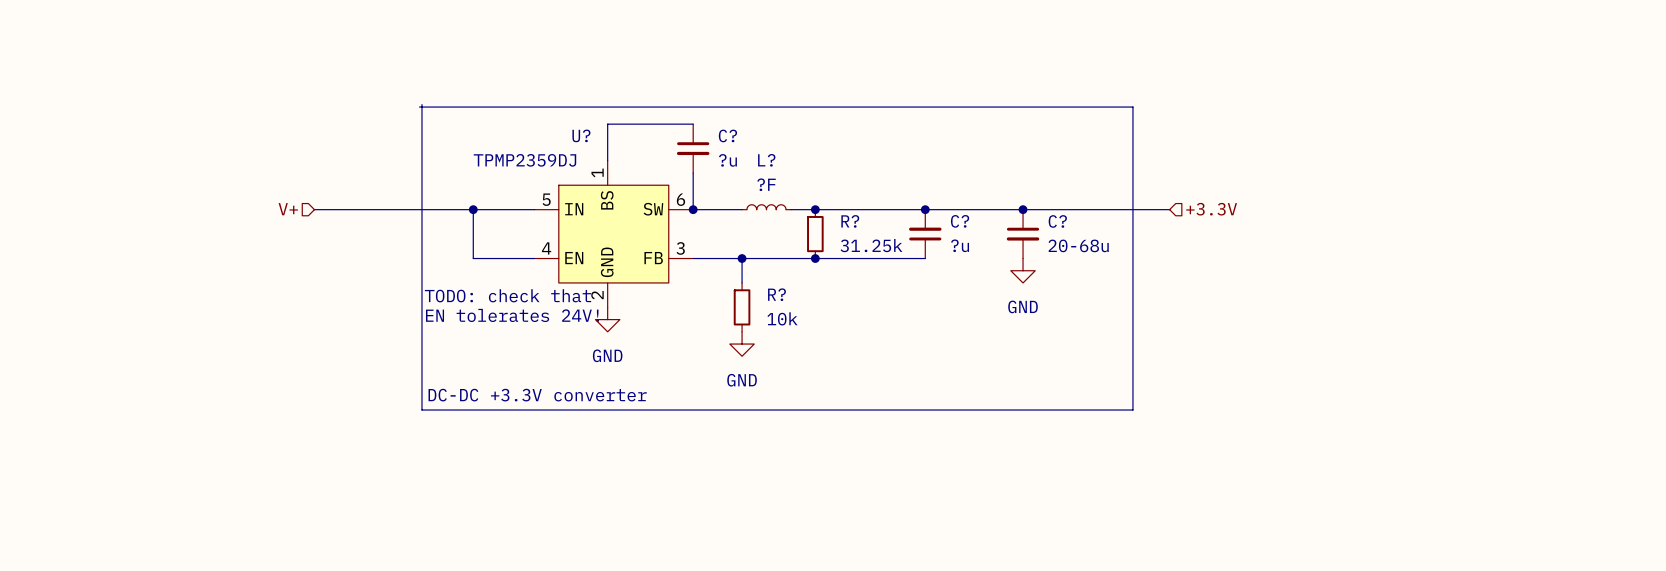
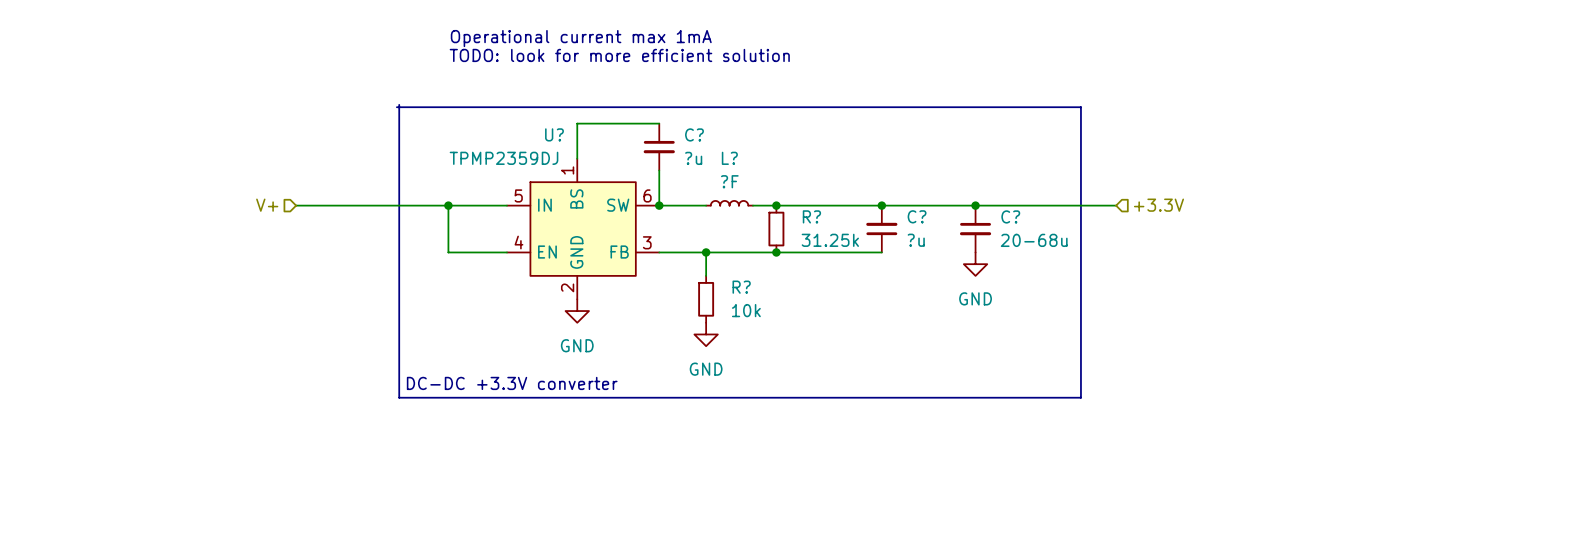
text: none -> Operational current max 1mA (581, 38)
text: none -> TODO: look for more efficient solution (619, 55)
text: TODO: check that (508, 295) -> none
text: EN tolerates 24V! (512, 315) -> none

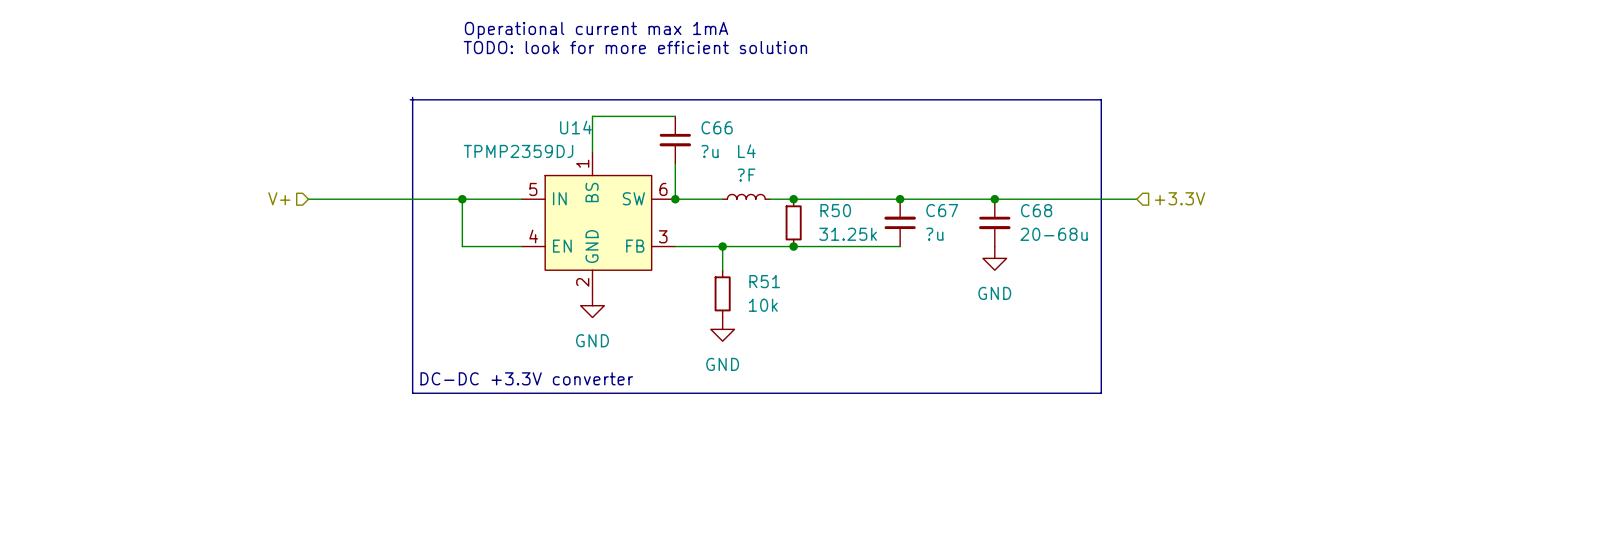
U? name: U? (554, 134) -> U14 (575, 127)
C? name: C? (694, 134) -> C66 (717, 127)
L? name: L? (729, 158) -> L4 (746, 151)
R? name: R? (811, 216) -> R50 (835, 210)
C? name: C? (917, 216) -> C67 (942, 210)
C? name: C? (1010, 216) -> C68 (1036, 210)
R? name: R? (741, 287) -> R51 (764, 281)

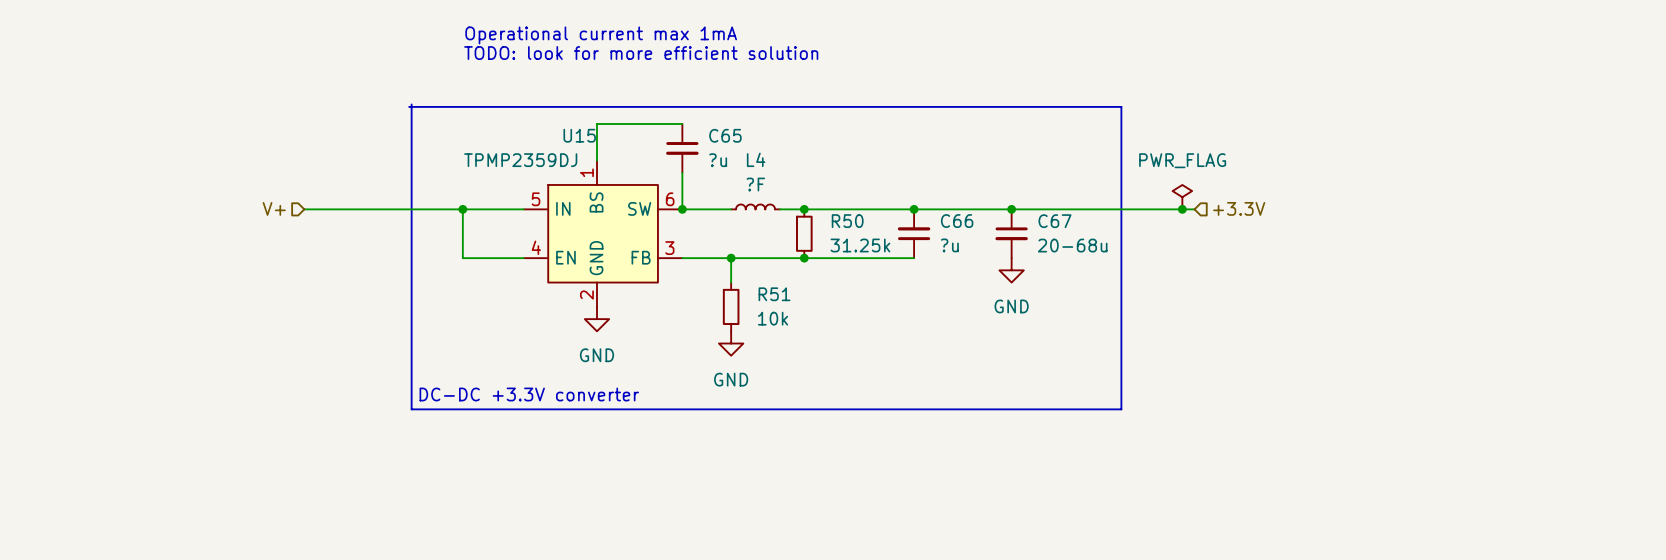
U14 name: U14 (575, 127) -> U15 (579, 135)
C66 name: C66 (717, 127) -> C65 (725, 135)
power symbol: none -> PWR_FLAG (1182, 197)
hierarchical label position: +3.3V (1180, 198) -> +3.3V (1239, 208)
wire: none -> (1157, 209) (1194, 209)
junction: none -> (1182, 209)
C67 name: C67 (942, 210) -> C66 (957, 221)
C68 name: C68 (1036, 210) -> C67 (1054, 221)

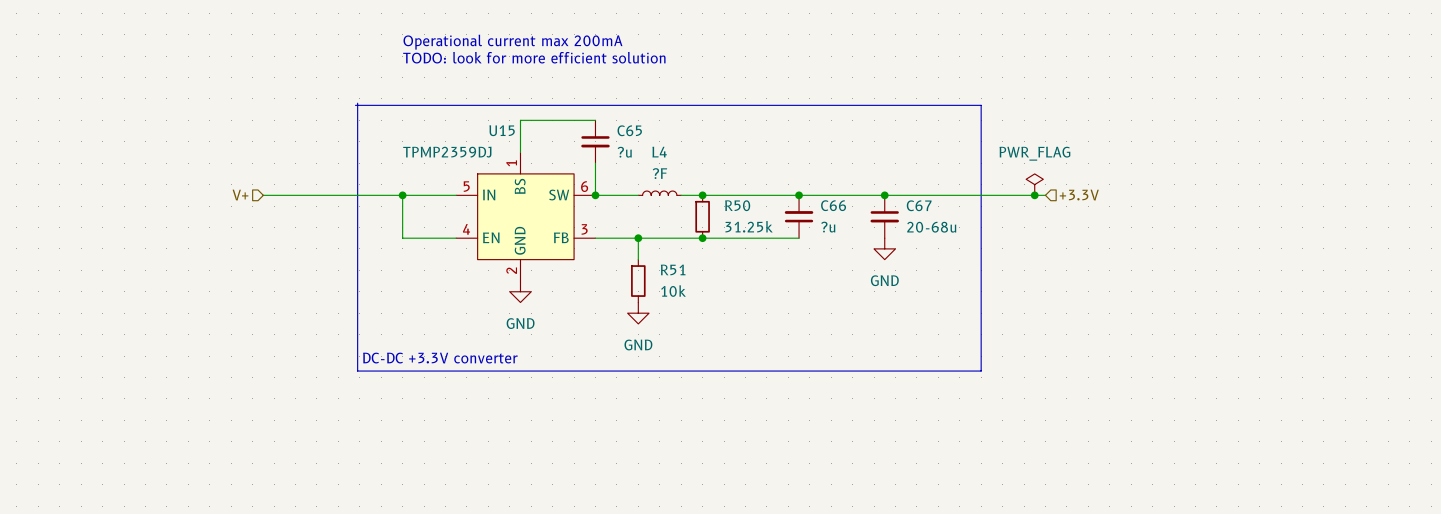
text: Operational current max 1mA (601, 35) -> Operational current max 200mA (512, 42)

